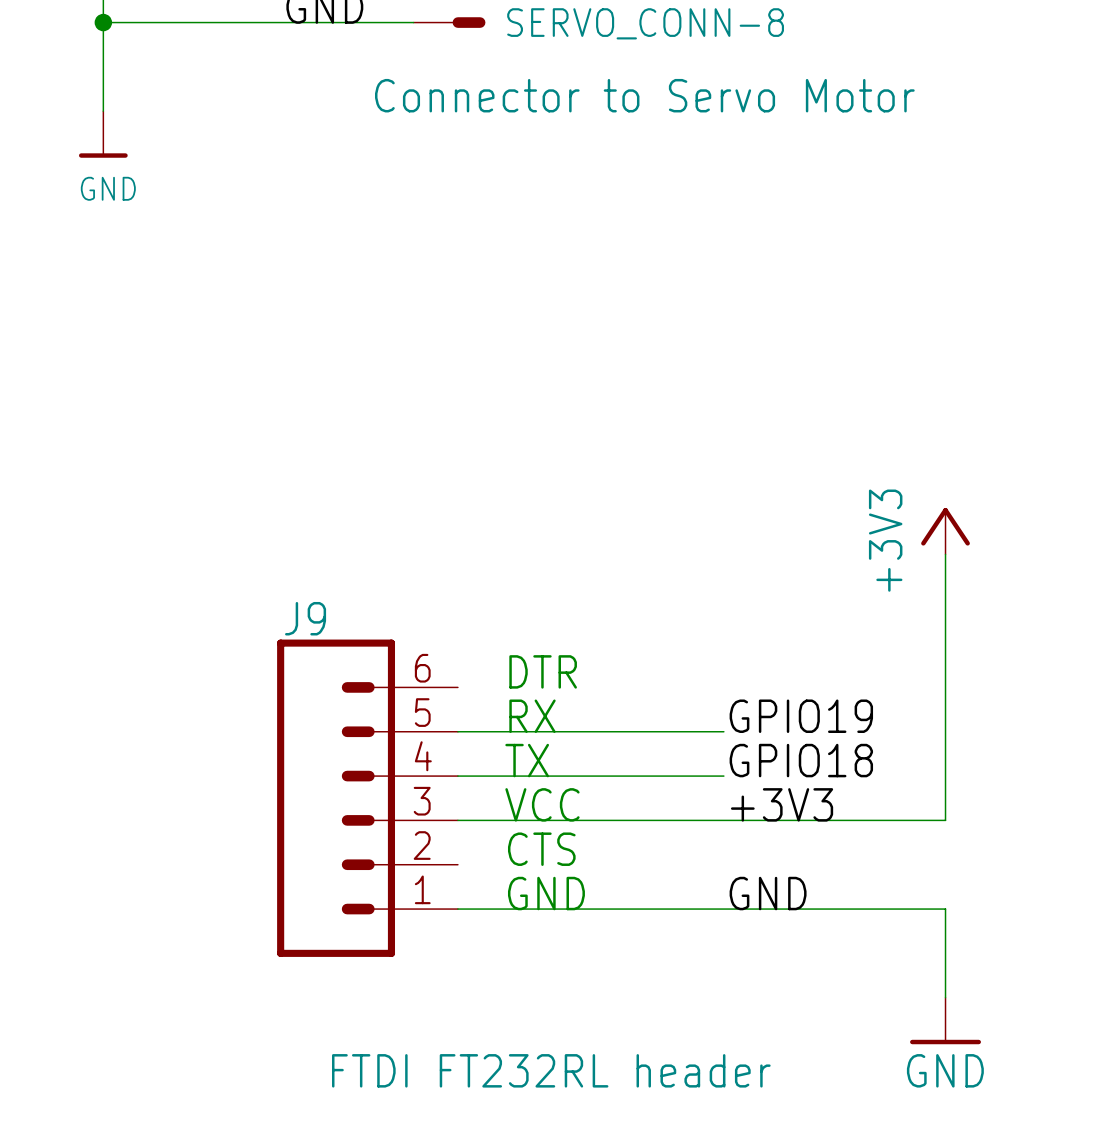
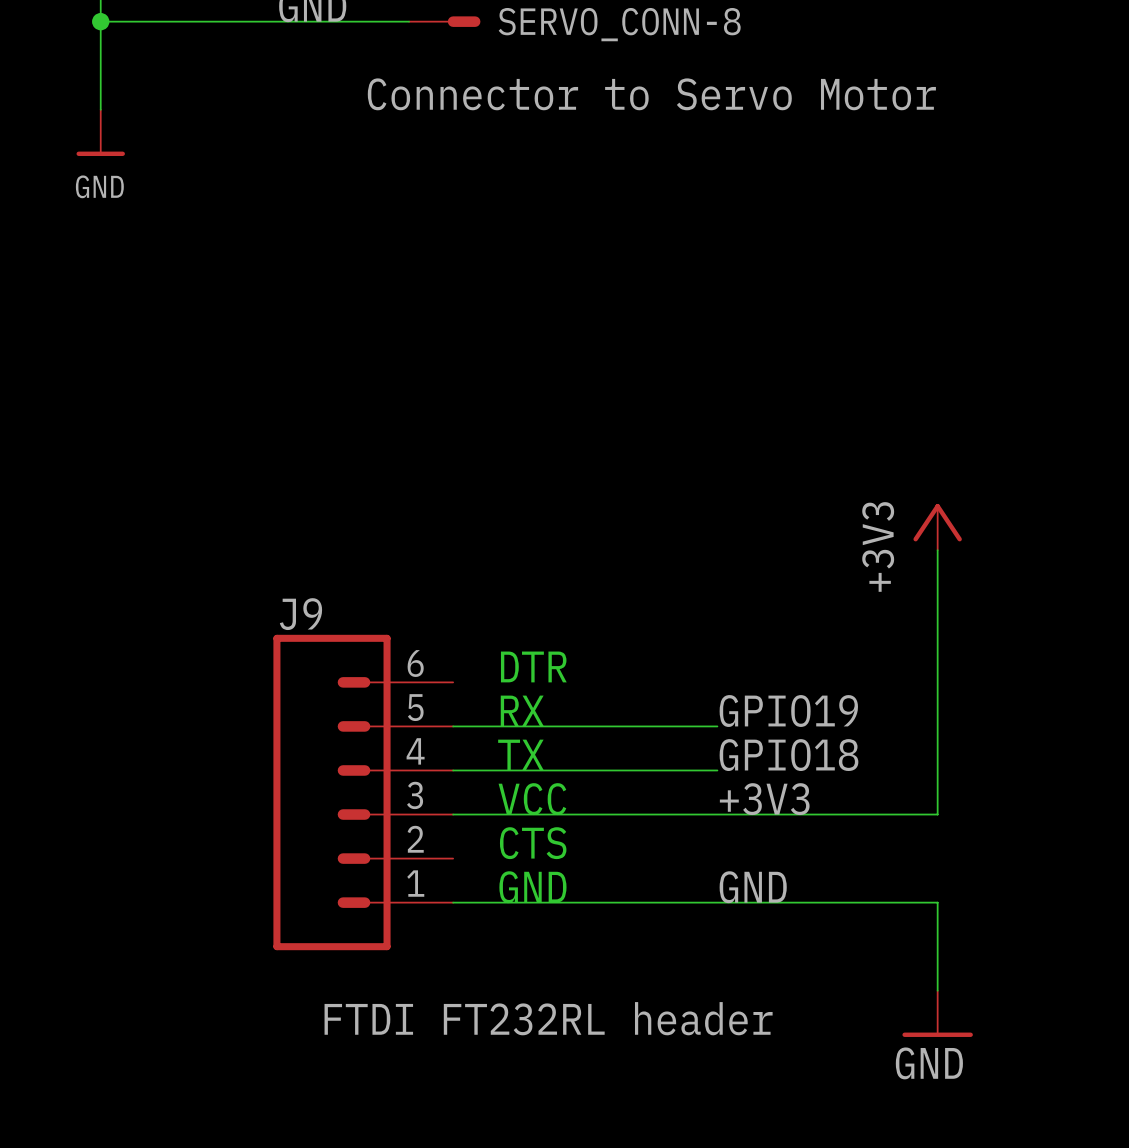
text position: FTDI FT232RL header (551, 1070) -> FTDI FT232RL header (548, 1018)

